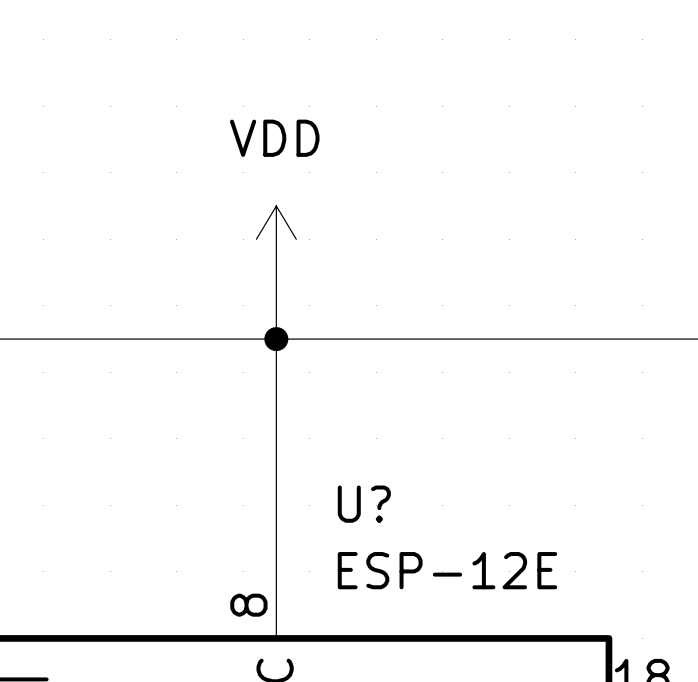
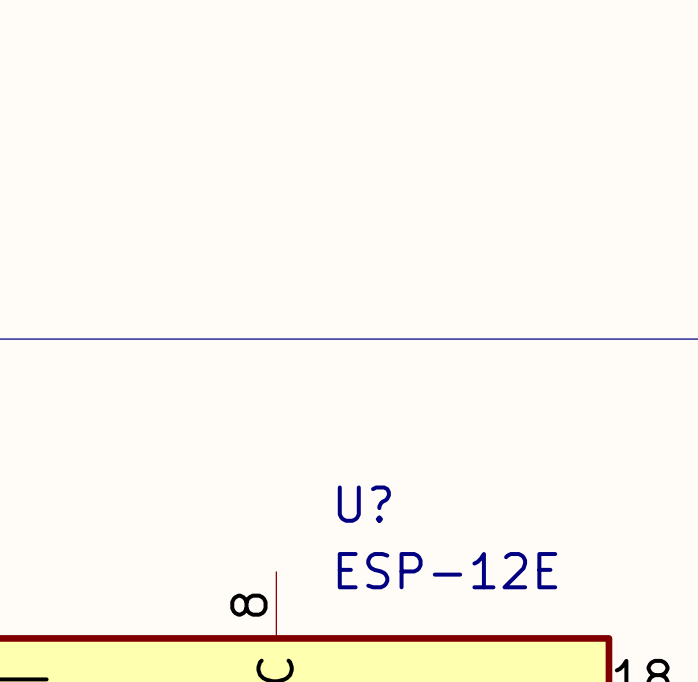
power symbol: VDD (276, 239) -> none
wire: (276, 272) (276, 571) -> none
junction: (276, 339) -> none

